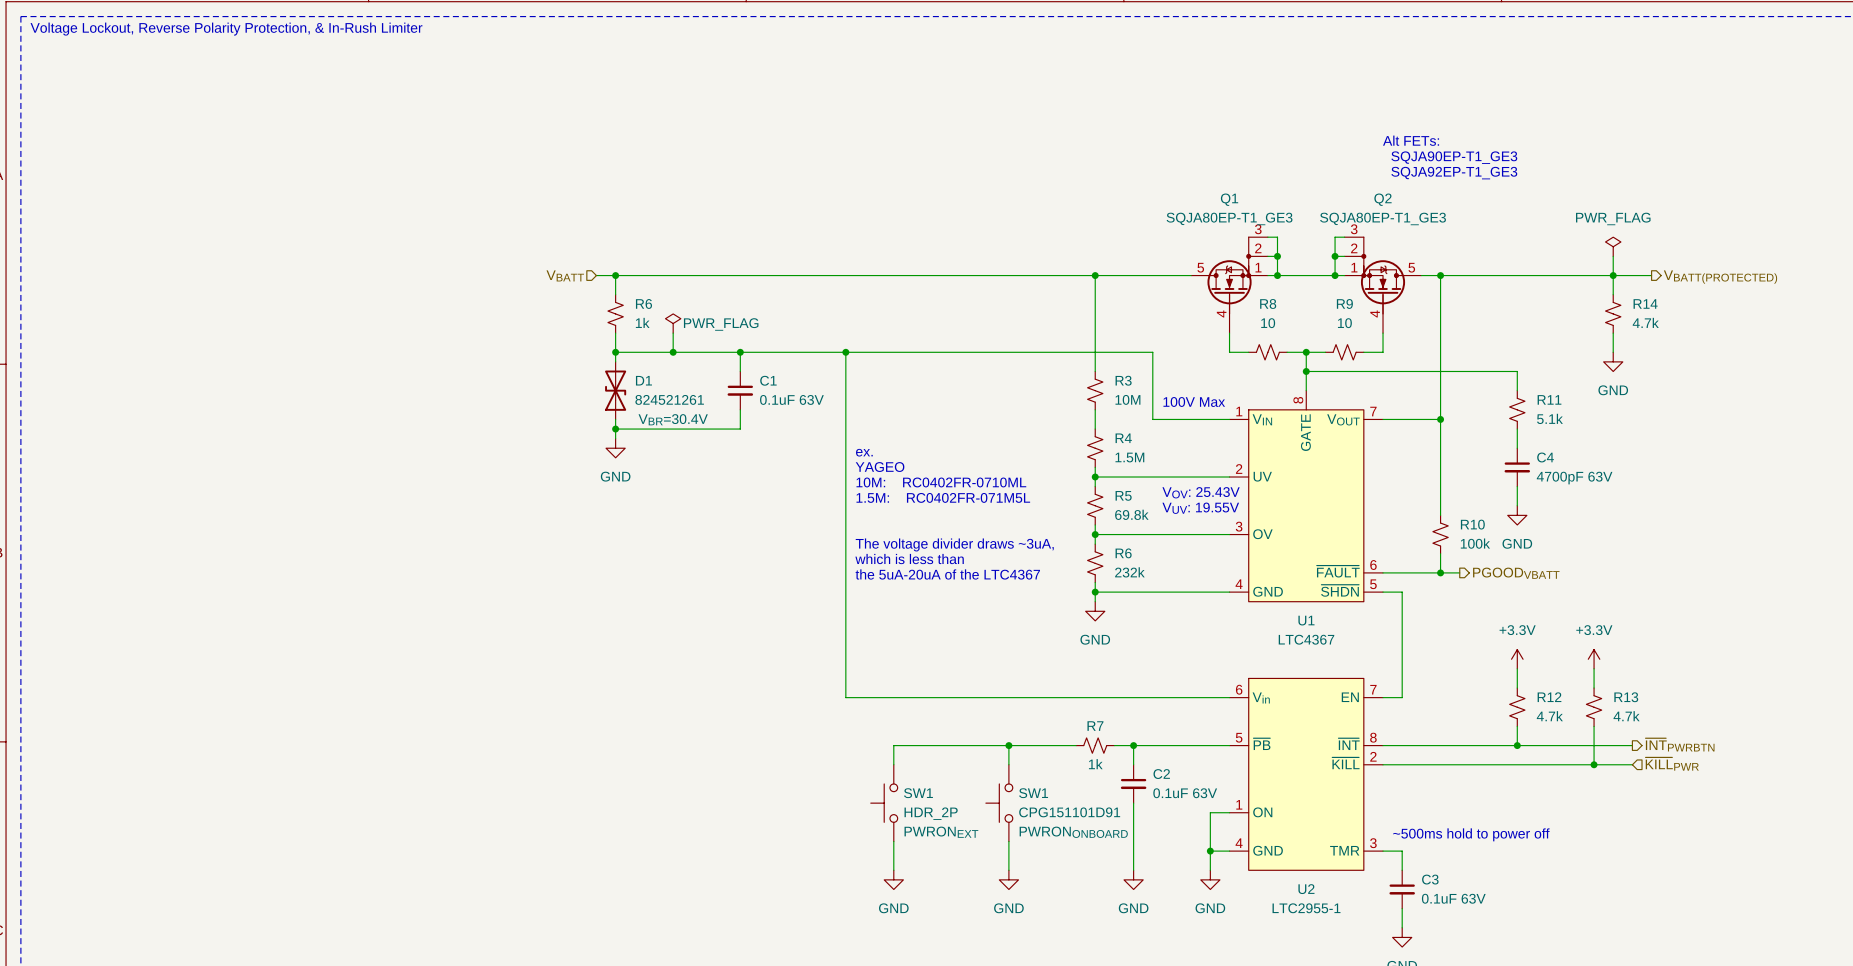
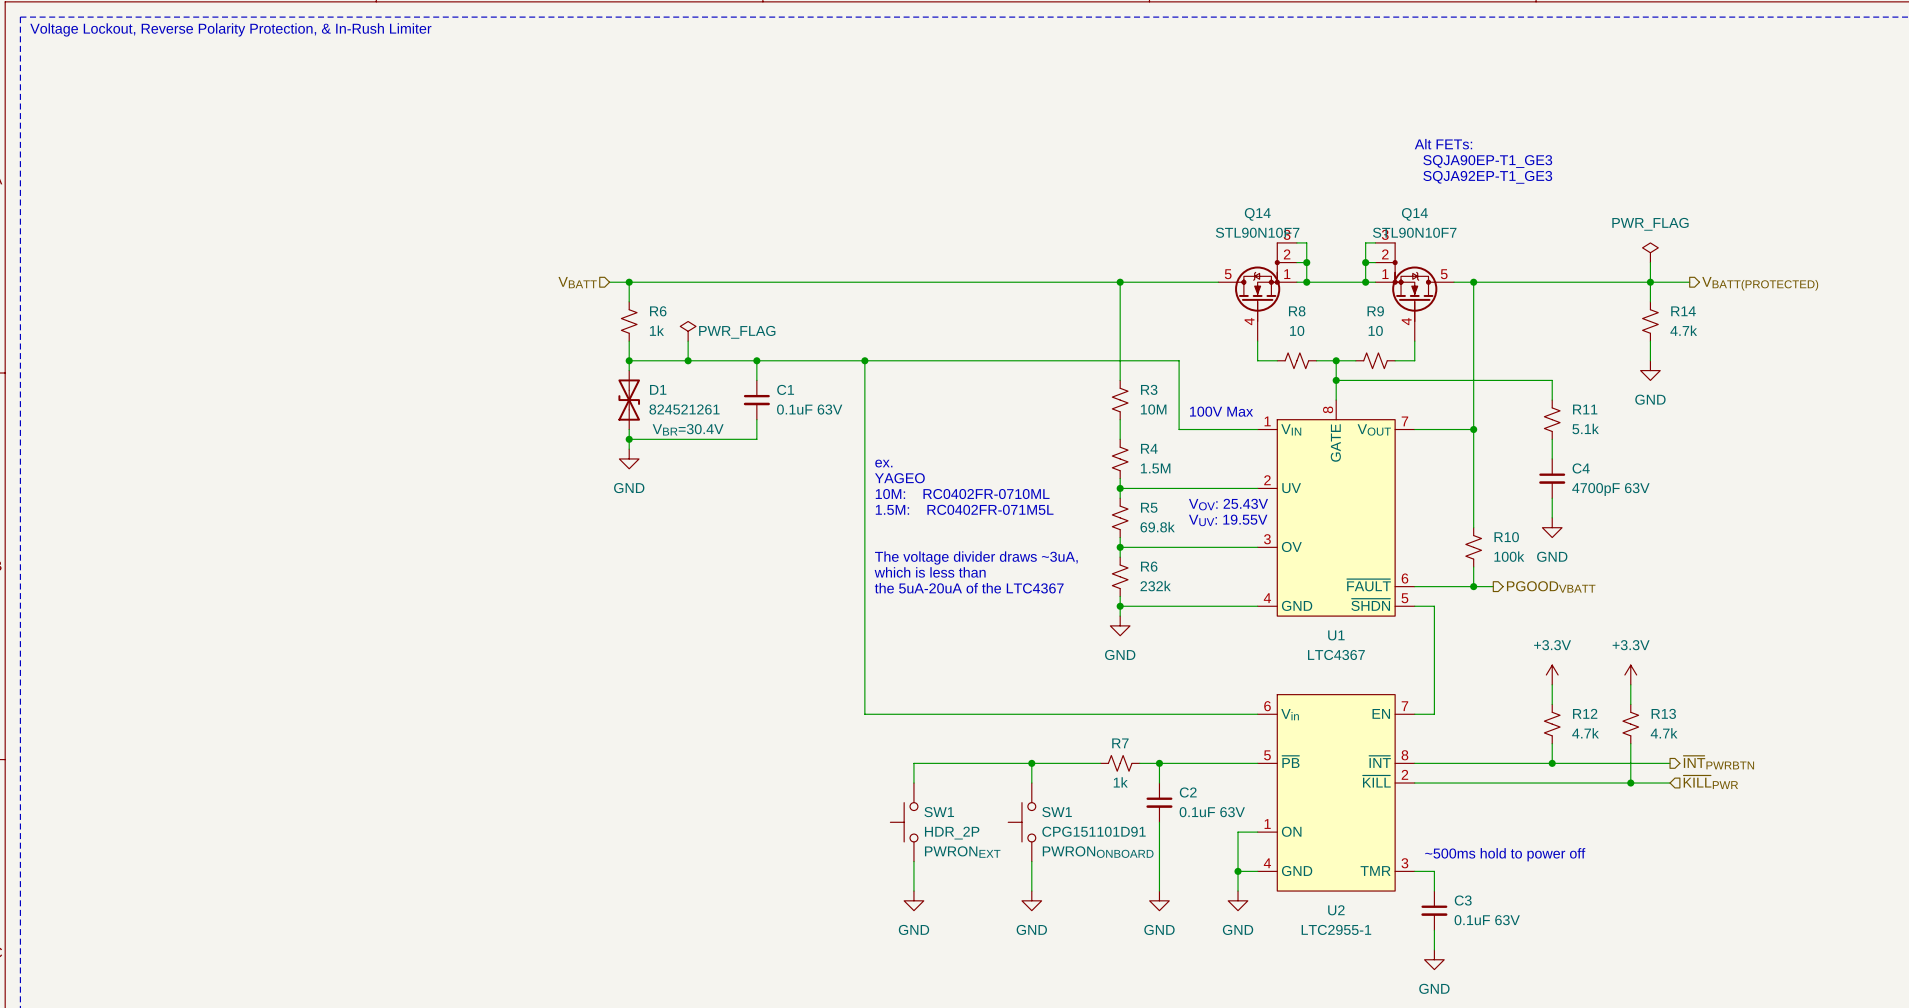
Q1 name: Q1 (1229, 199) -> Q14 (1257, 214)
Q2 name: Q2 (1382, 199) -> Q14 (1414, 214)
Q1 value: SQJA80EP-T1_GE3 (1229, 218) -> STL90N10F7 (1257, 232)
Q2 value: SQJA80EP-T1_GE3 (1383, 218) -> STL90N10F7 (1414, 232)

